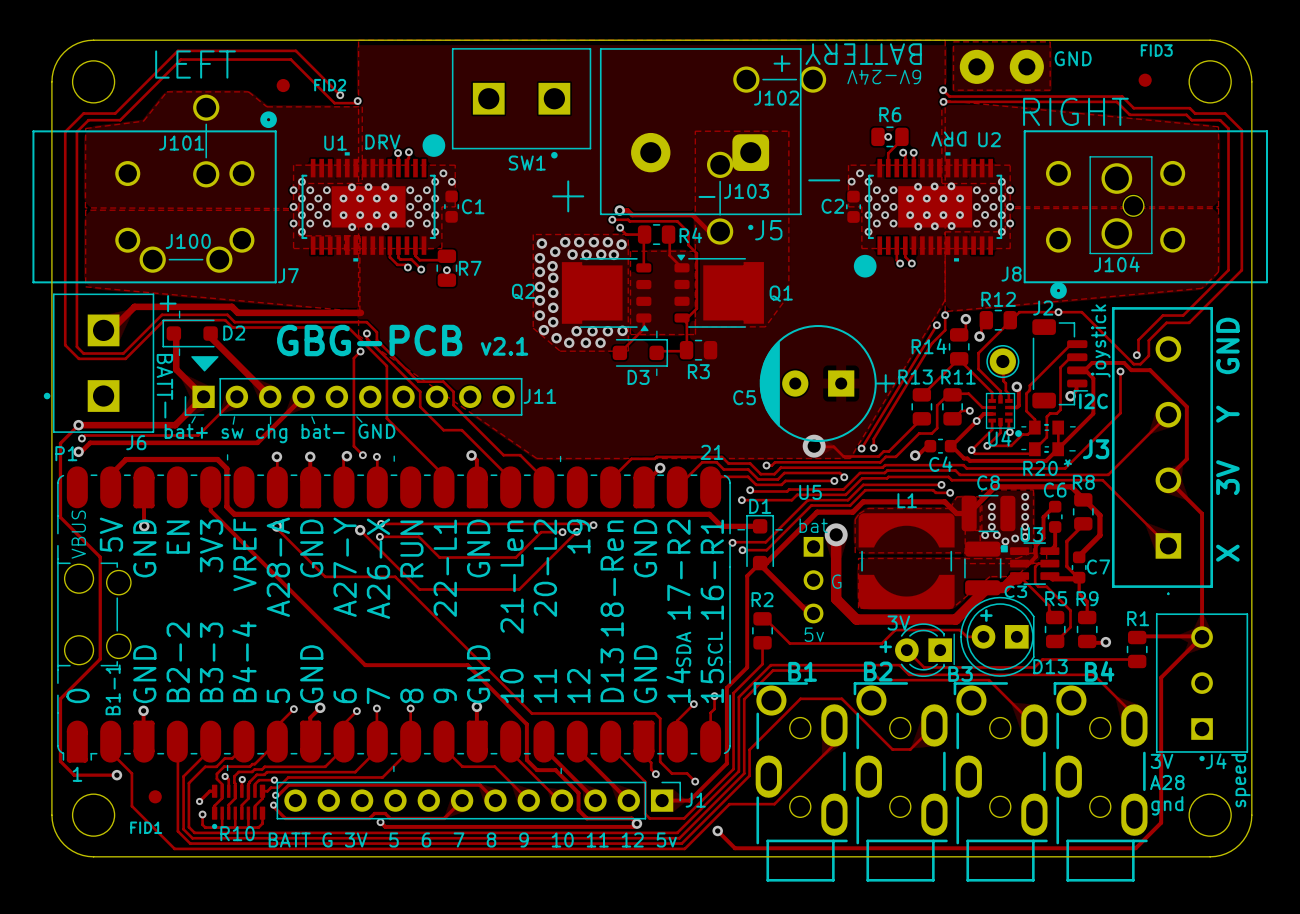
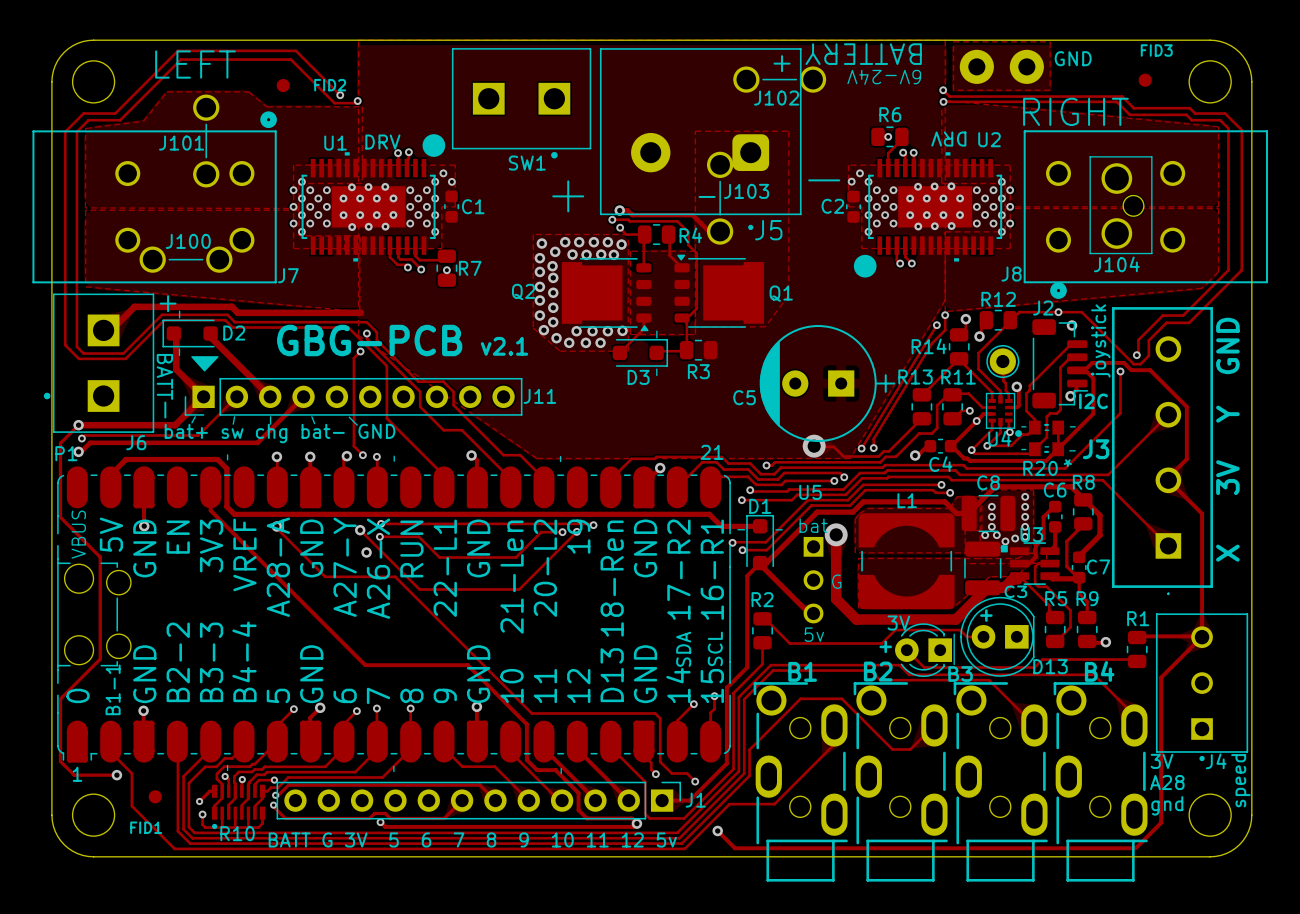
via: none -> (1072, 325)
line: (356, 416) (361, 422) -> none
line: none -> (349, 417) (357, 425)
via: none -> (366, 552)

